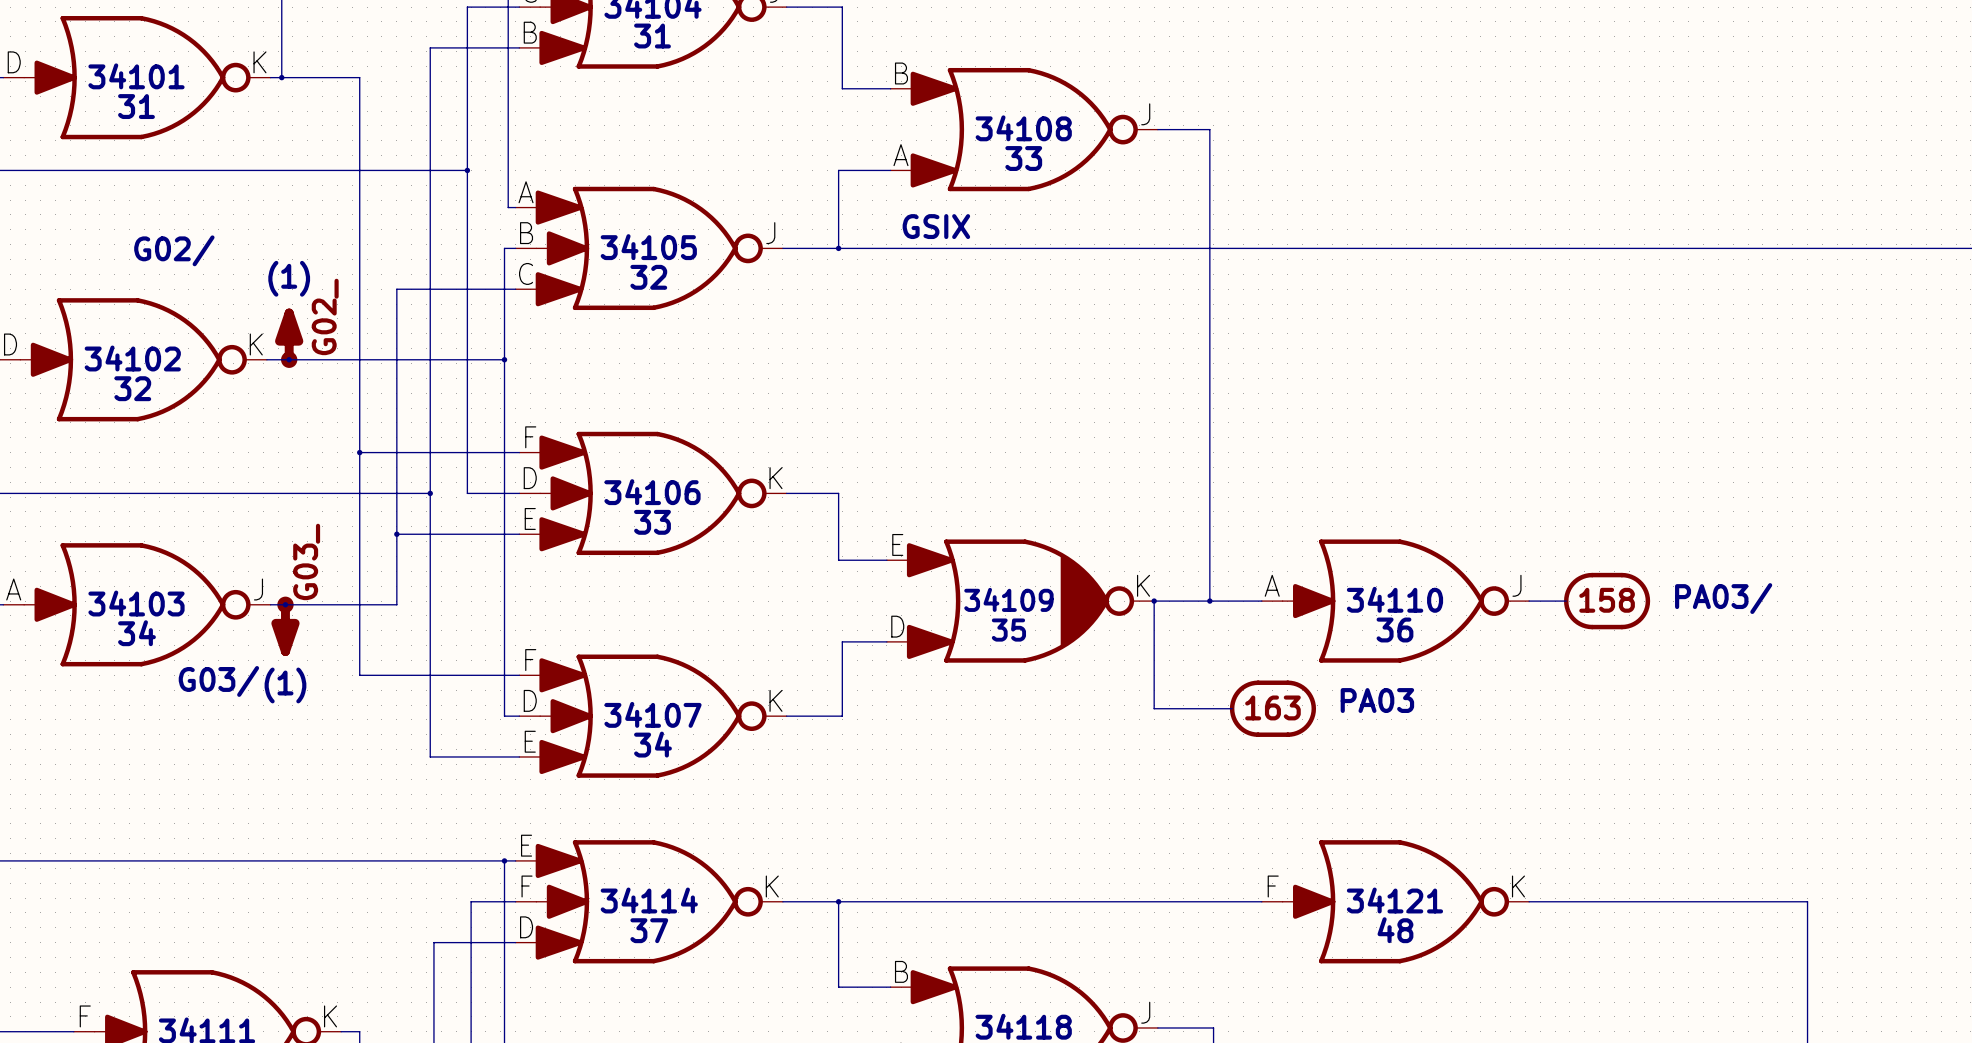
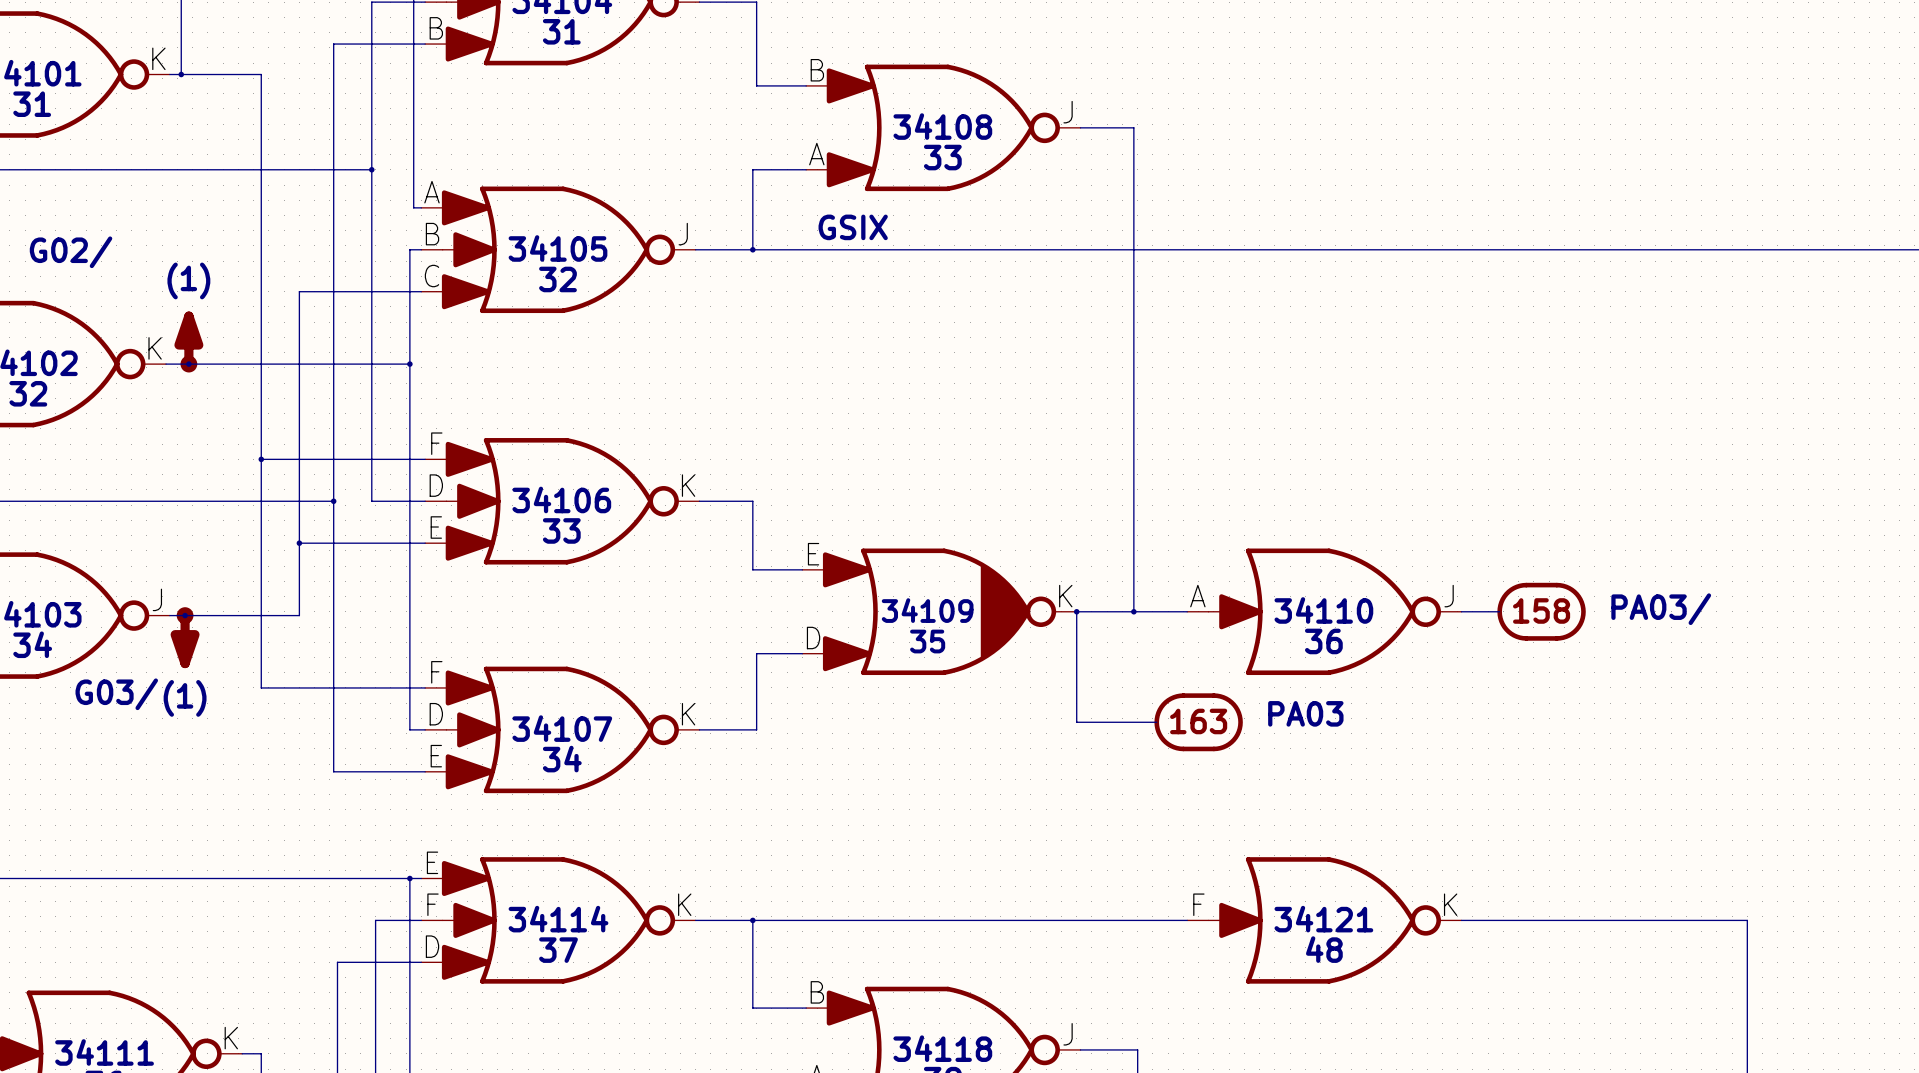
label: G02_ (325, 316) -> none
label: G03_ (306, 561) -> none

